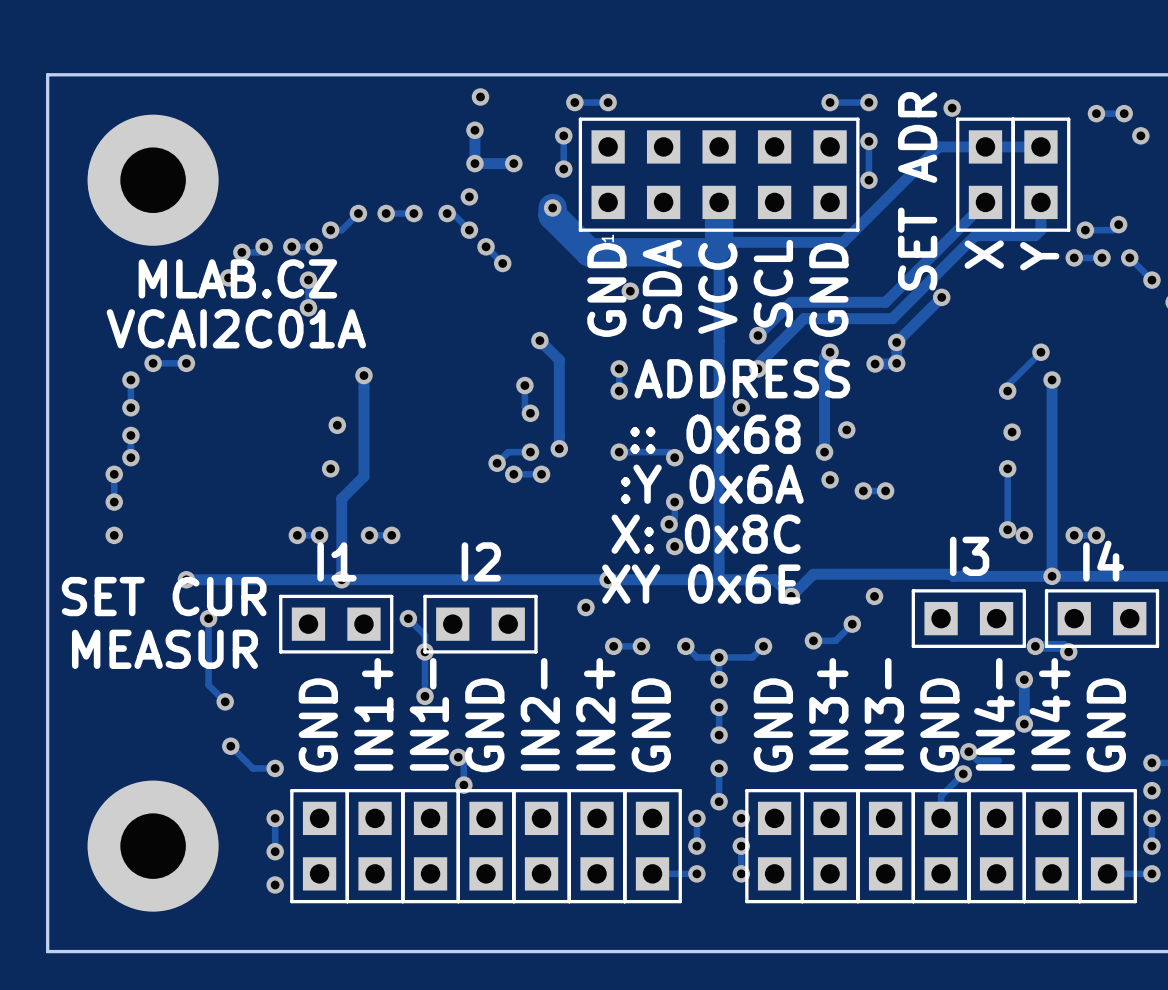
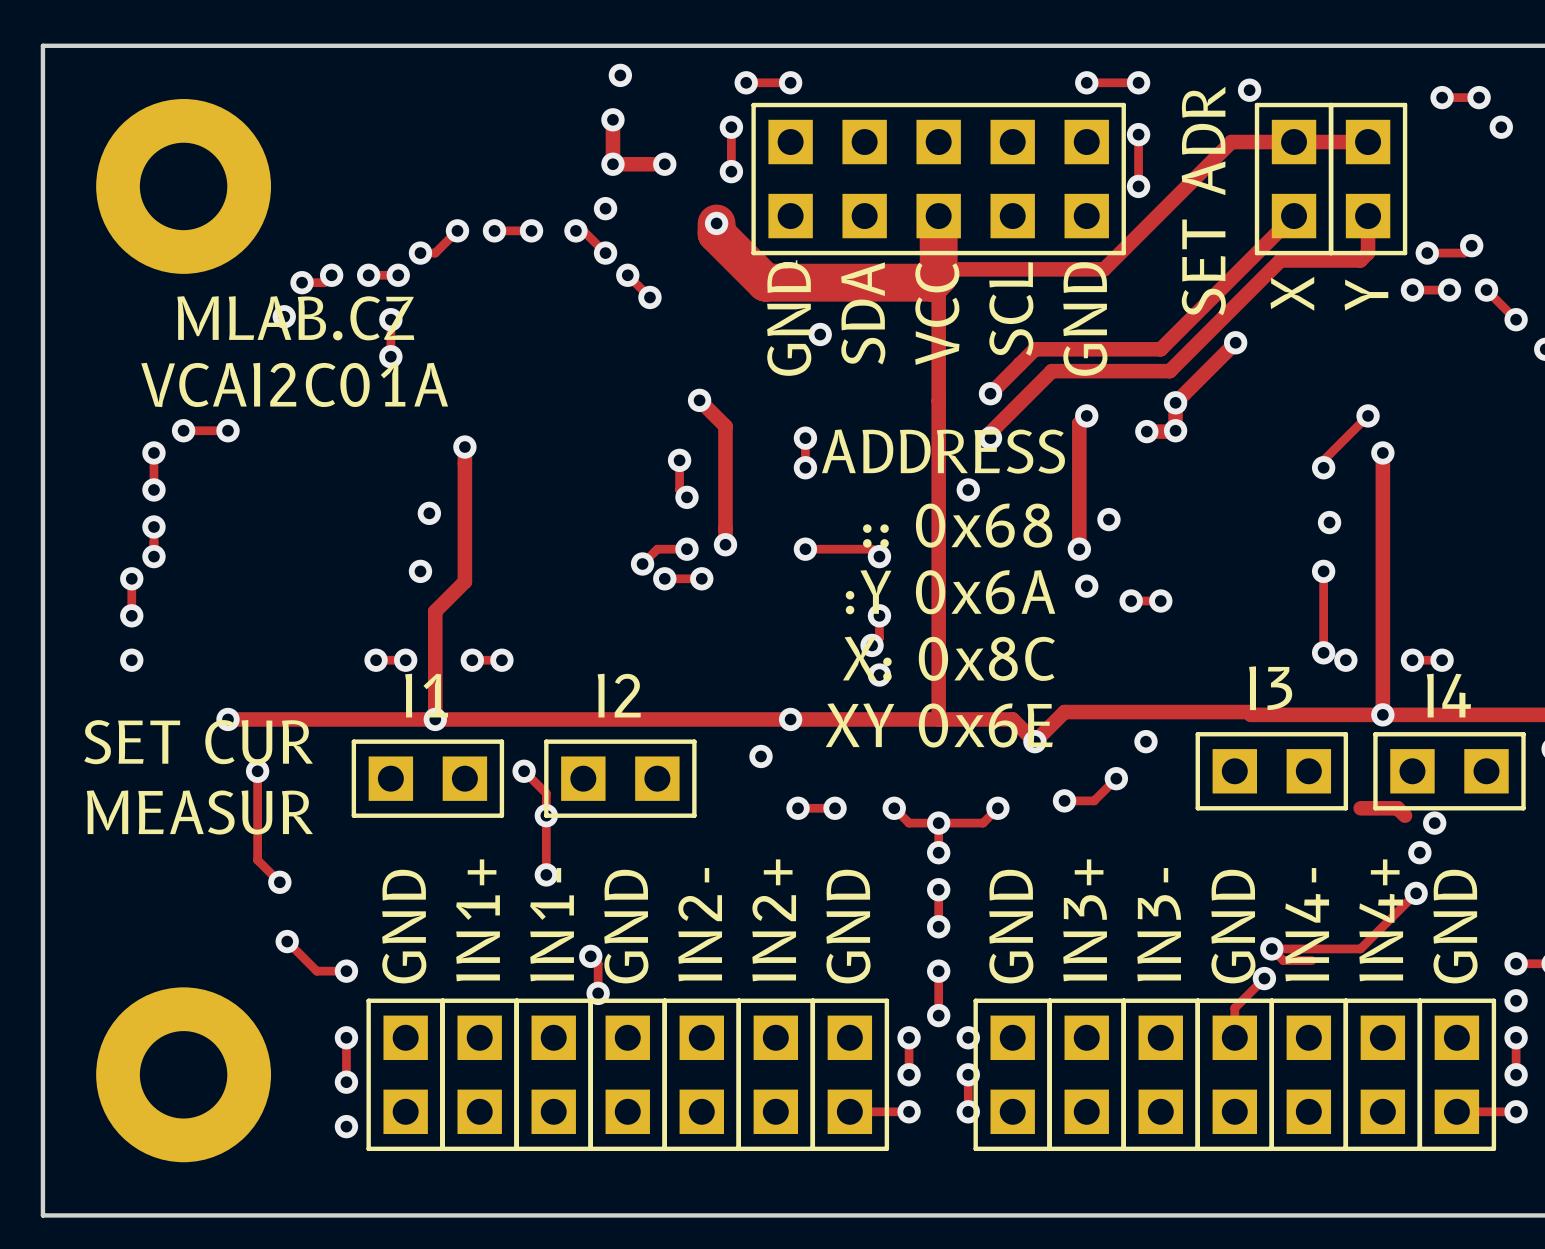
via: (1035, 646) -> none
via: (1068, 651) -> none
via: none -> (1434, 823)
track: (1024, 679) (1024, 724) -> none
via: (1024, 679) -> none
via: none -> (1419, 852)
track: none -> (1416, 893) (1360, 948) (1271, 948)
via: none -> (1416, 893)
via: (1024, 724) -> none

